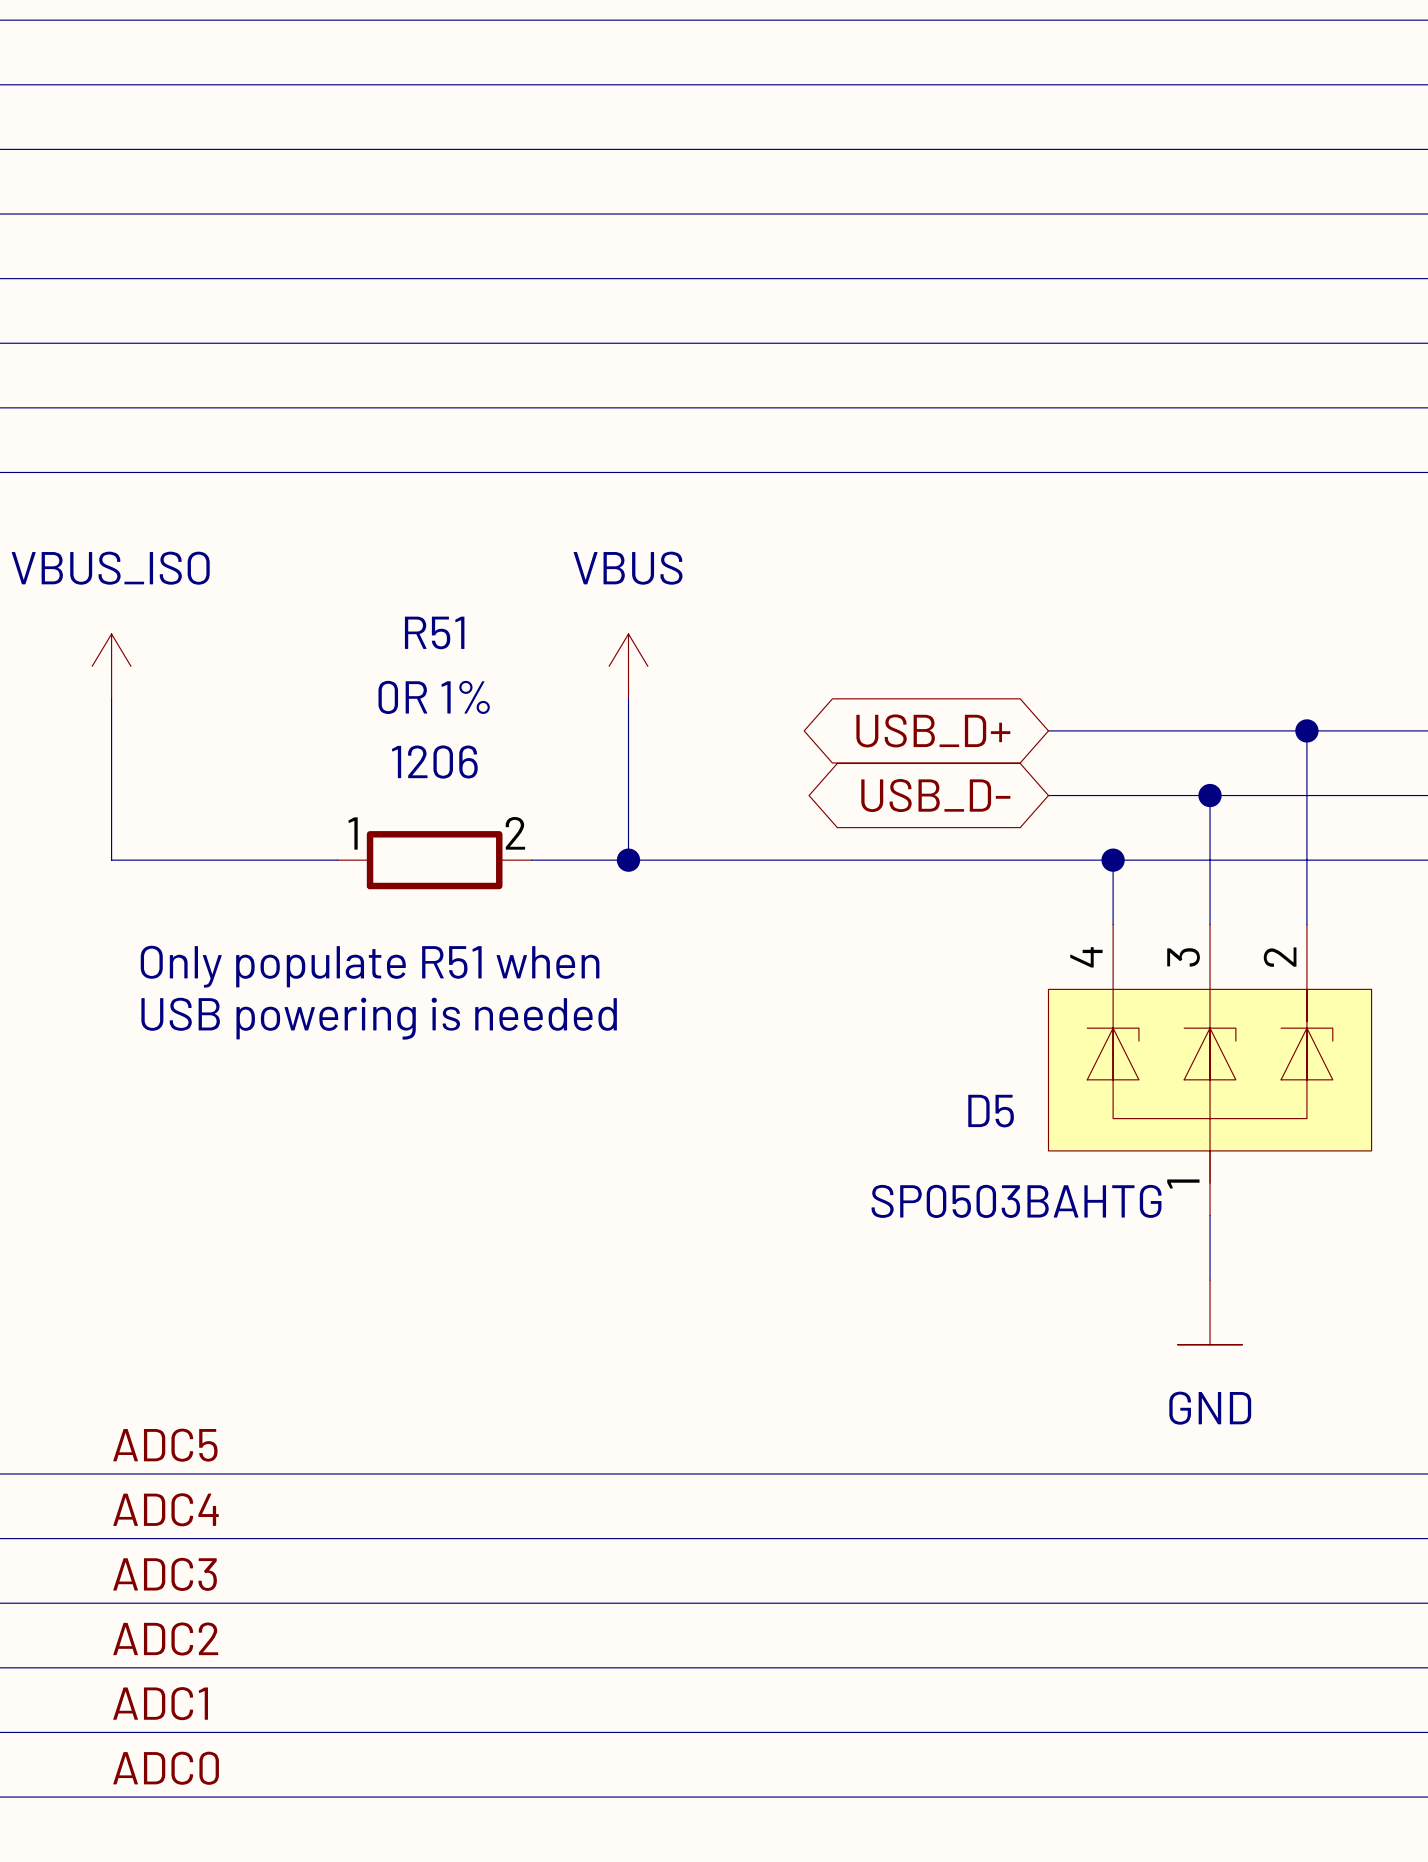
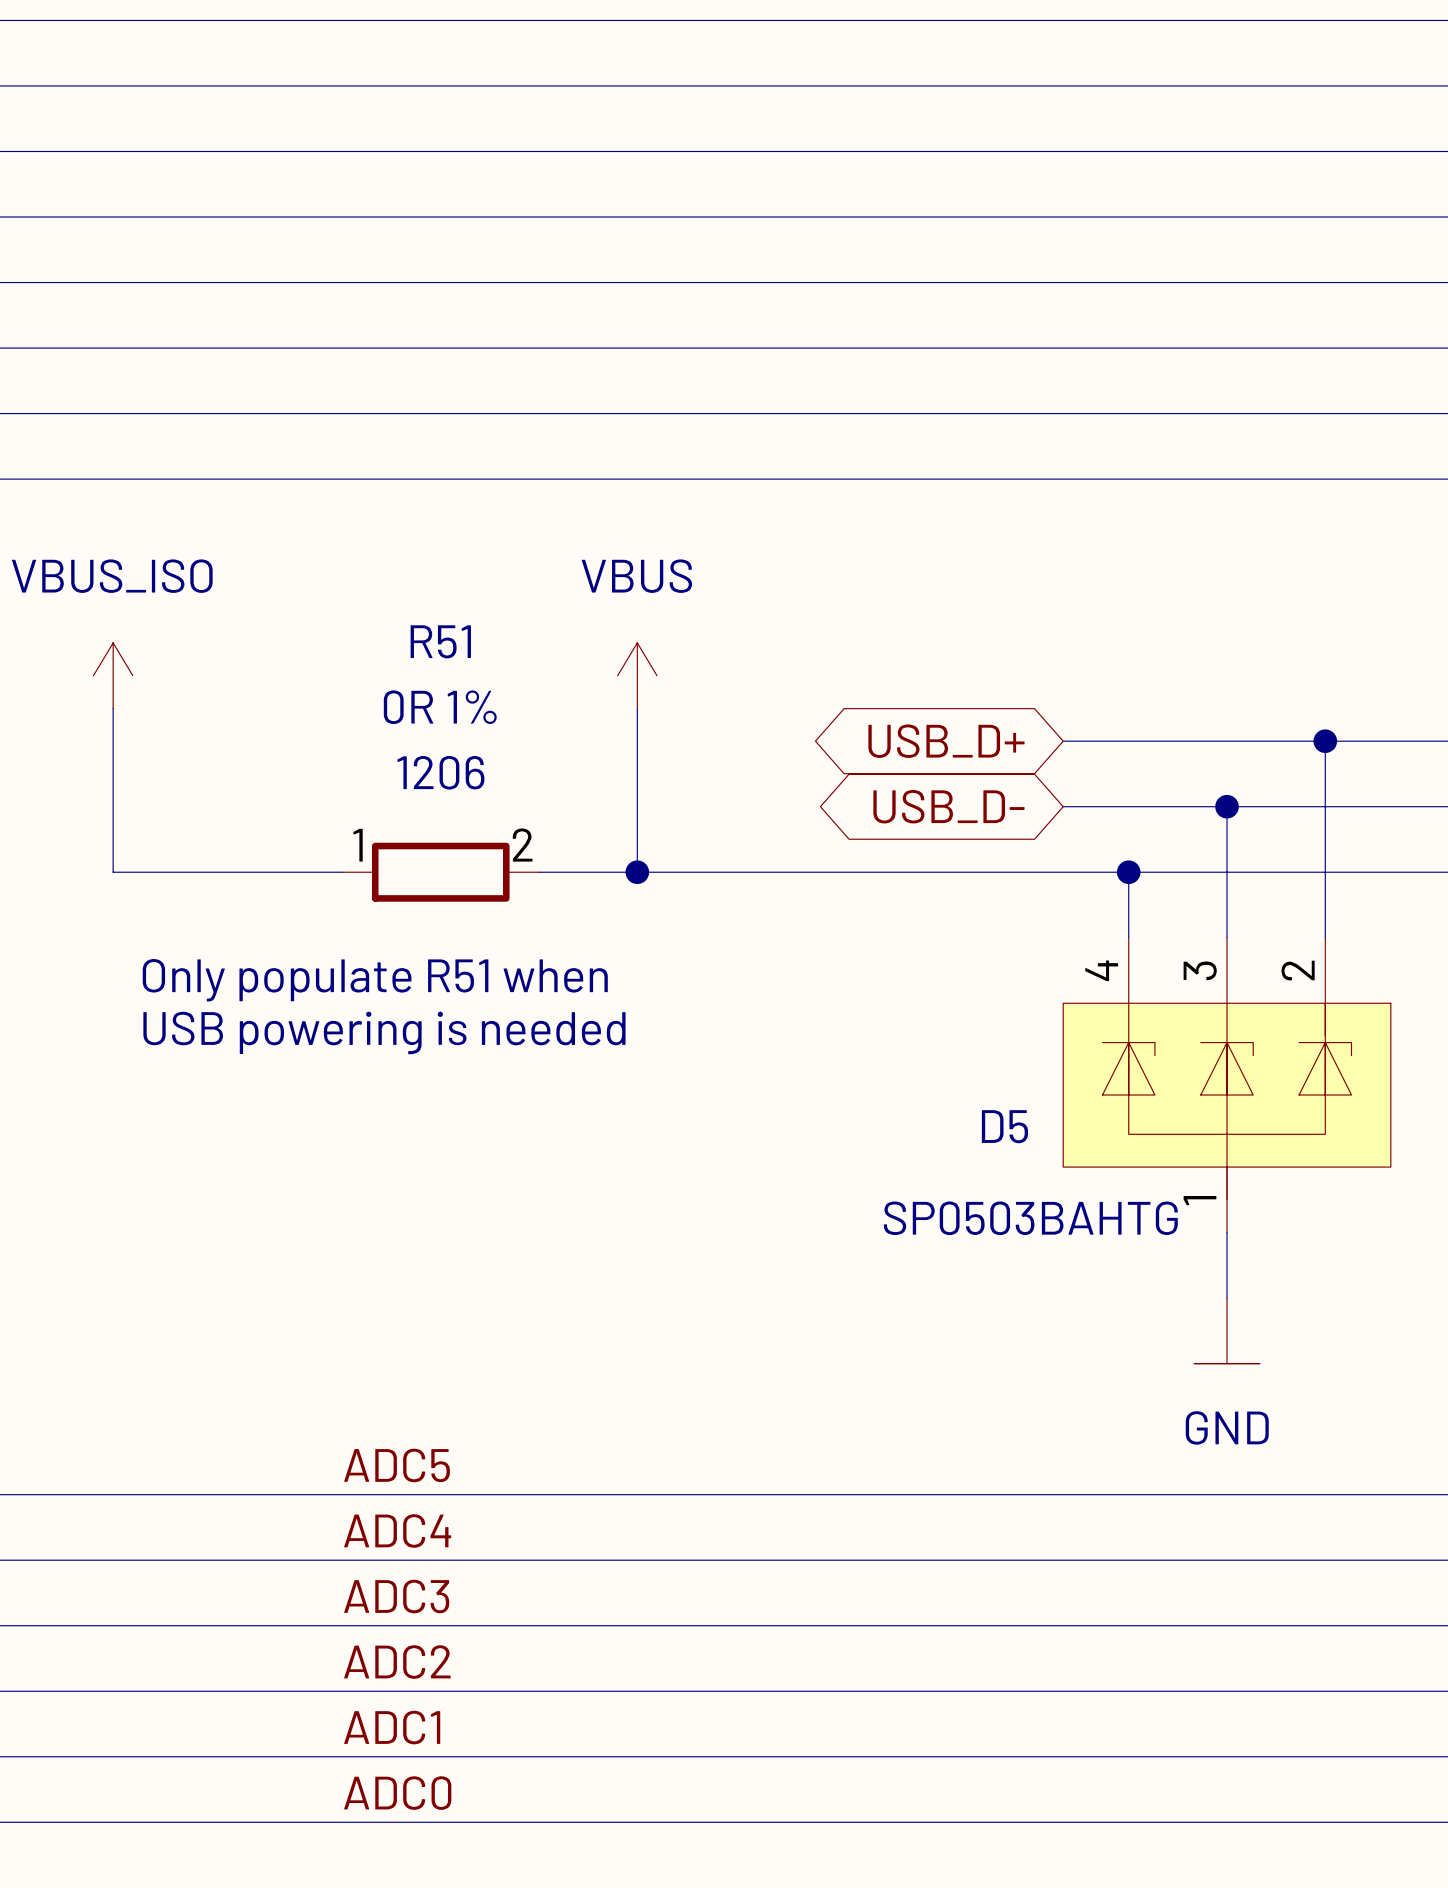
label position: ADC5 (165, 1445) -> ADC5 (396, 1465)
label position: ADC4 (165, 1509) -> ADC4 (397, 1530)
label position: ADC3 (165, 1574) -> ADC3 (396, 1596)
label position: ADC2 (165, 1639) -> ADC2 (397, 1662)
label position: ADC1 (160, 1703) -> ADC1 (392, 1727)
label position: ADC0 (166, 1768) -> ADC0 (397, 1793)

